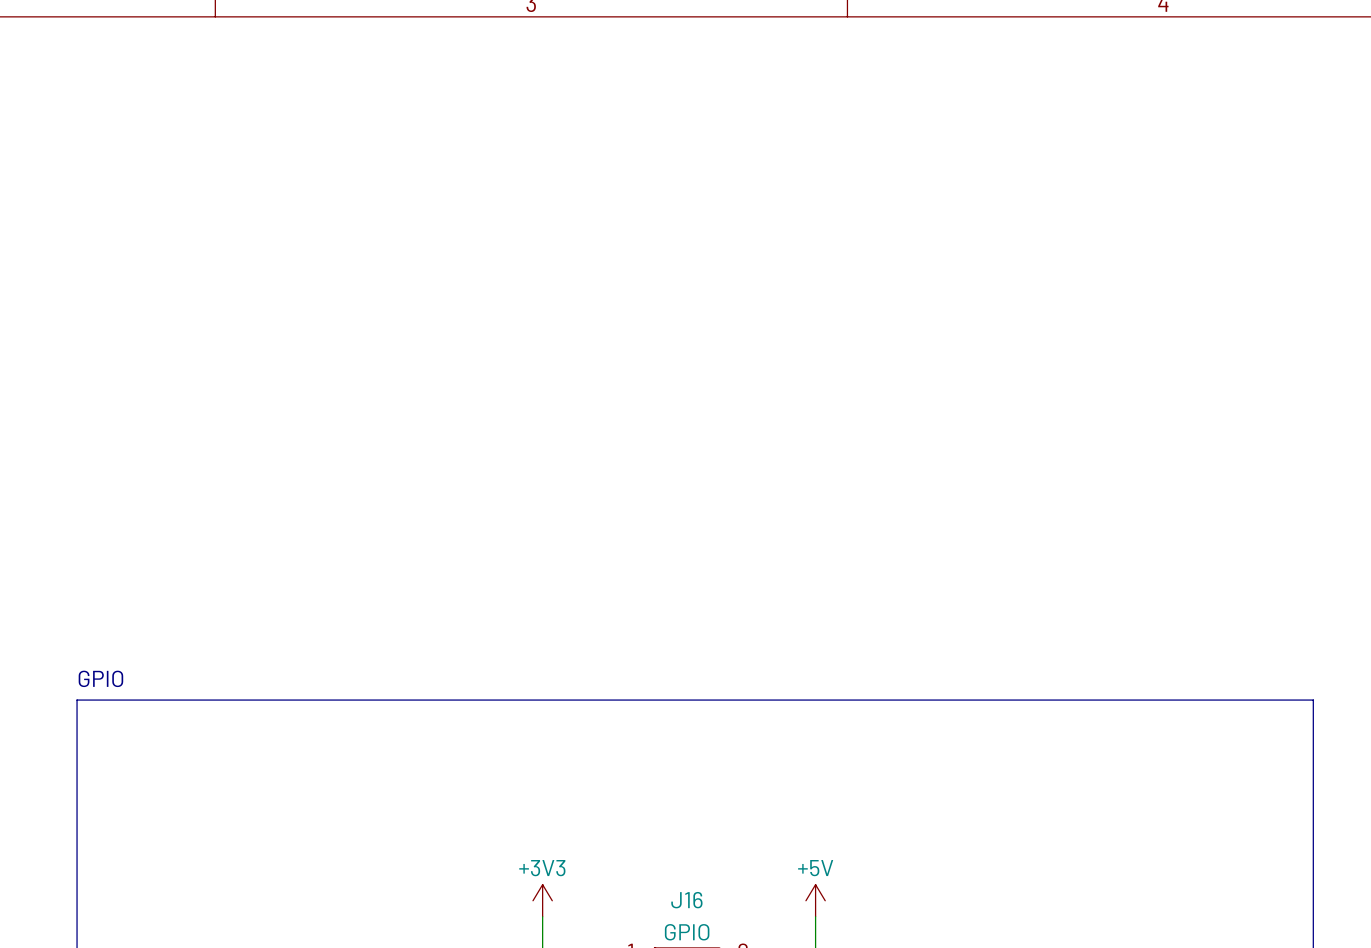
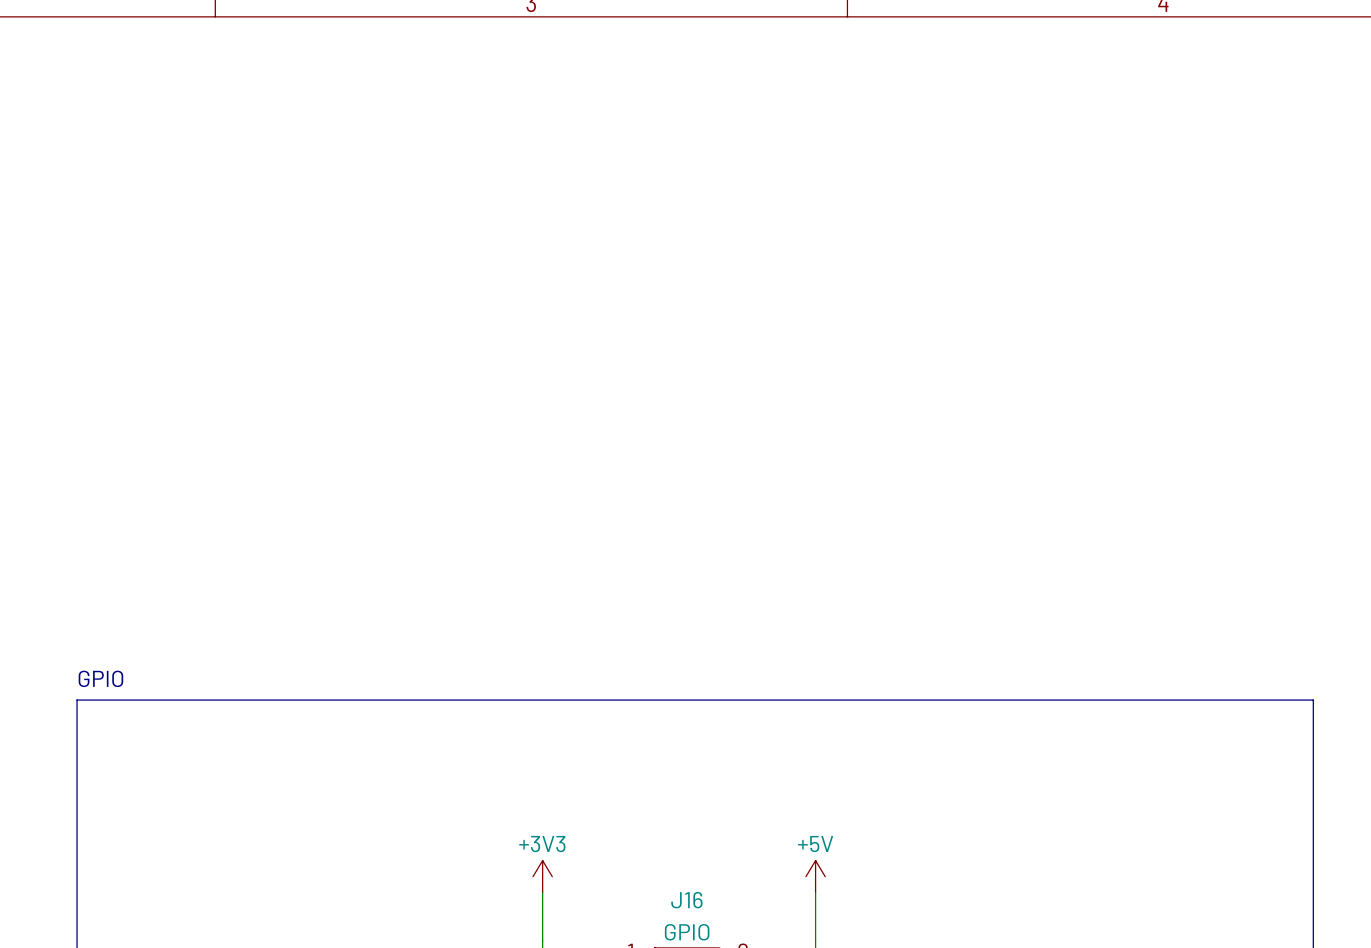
power symbol position: +3V3 (542, 900) -> +3V3 (542, 876)
power symbol position: +5V (815, 900) -> +5V (815, 876)

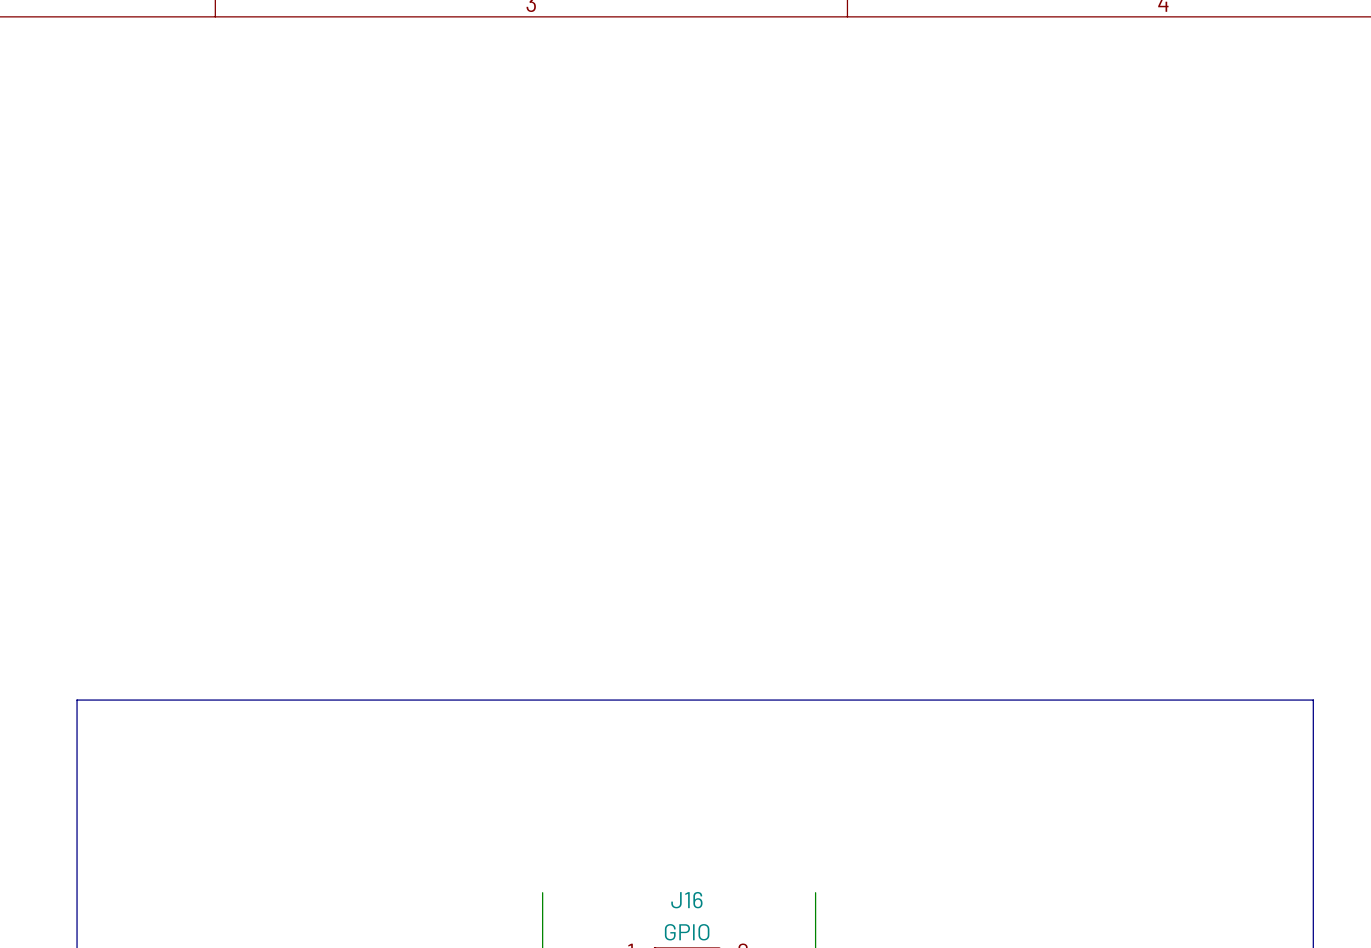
text: GPIO (100, 678) -> none
power symbol: +3V3 (542, 876) -> none
power symbol: +5V (815, 876) -> none

